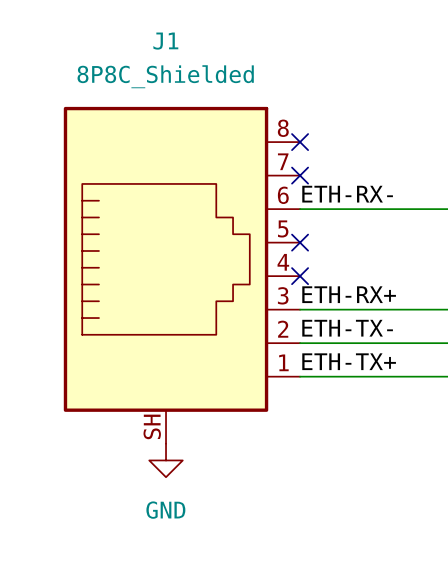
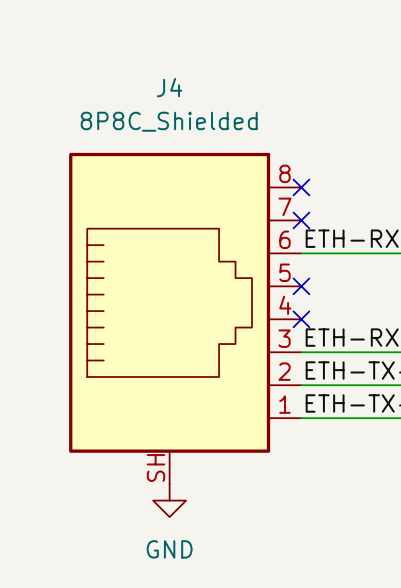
J1 name: J1 (165, 41) -> J4 (169, 87)

